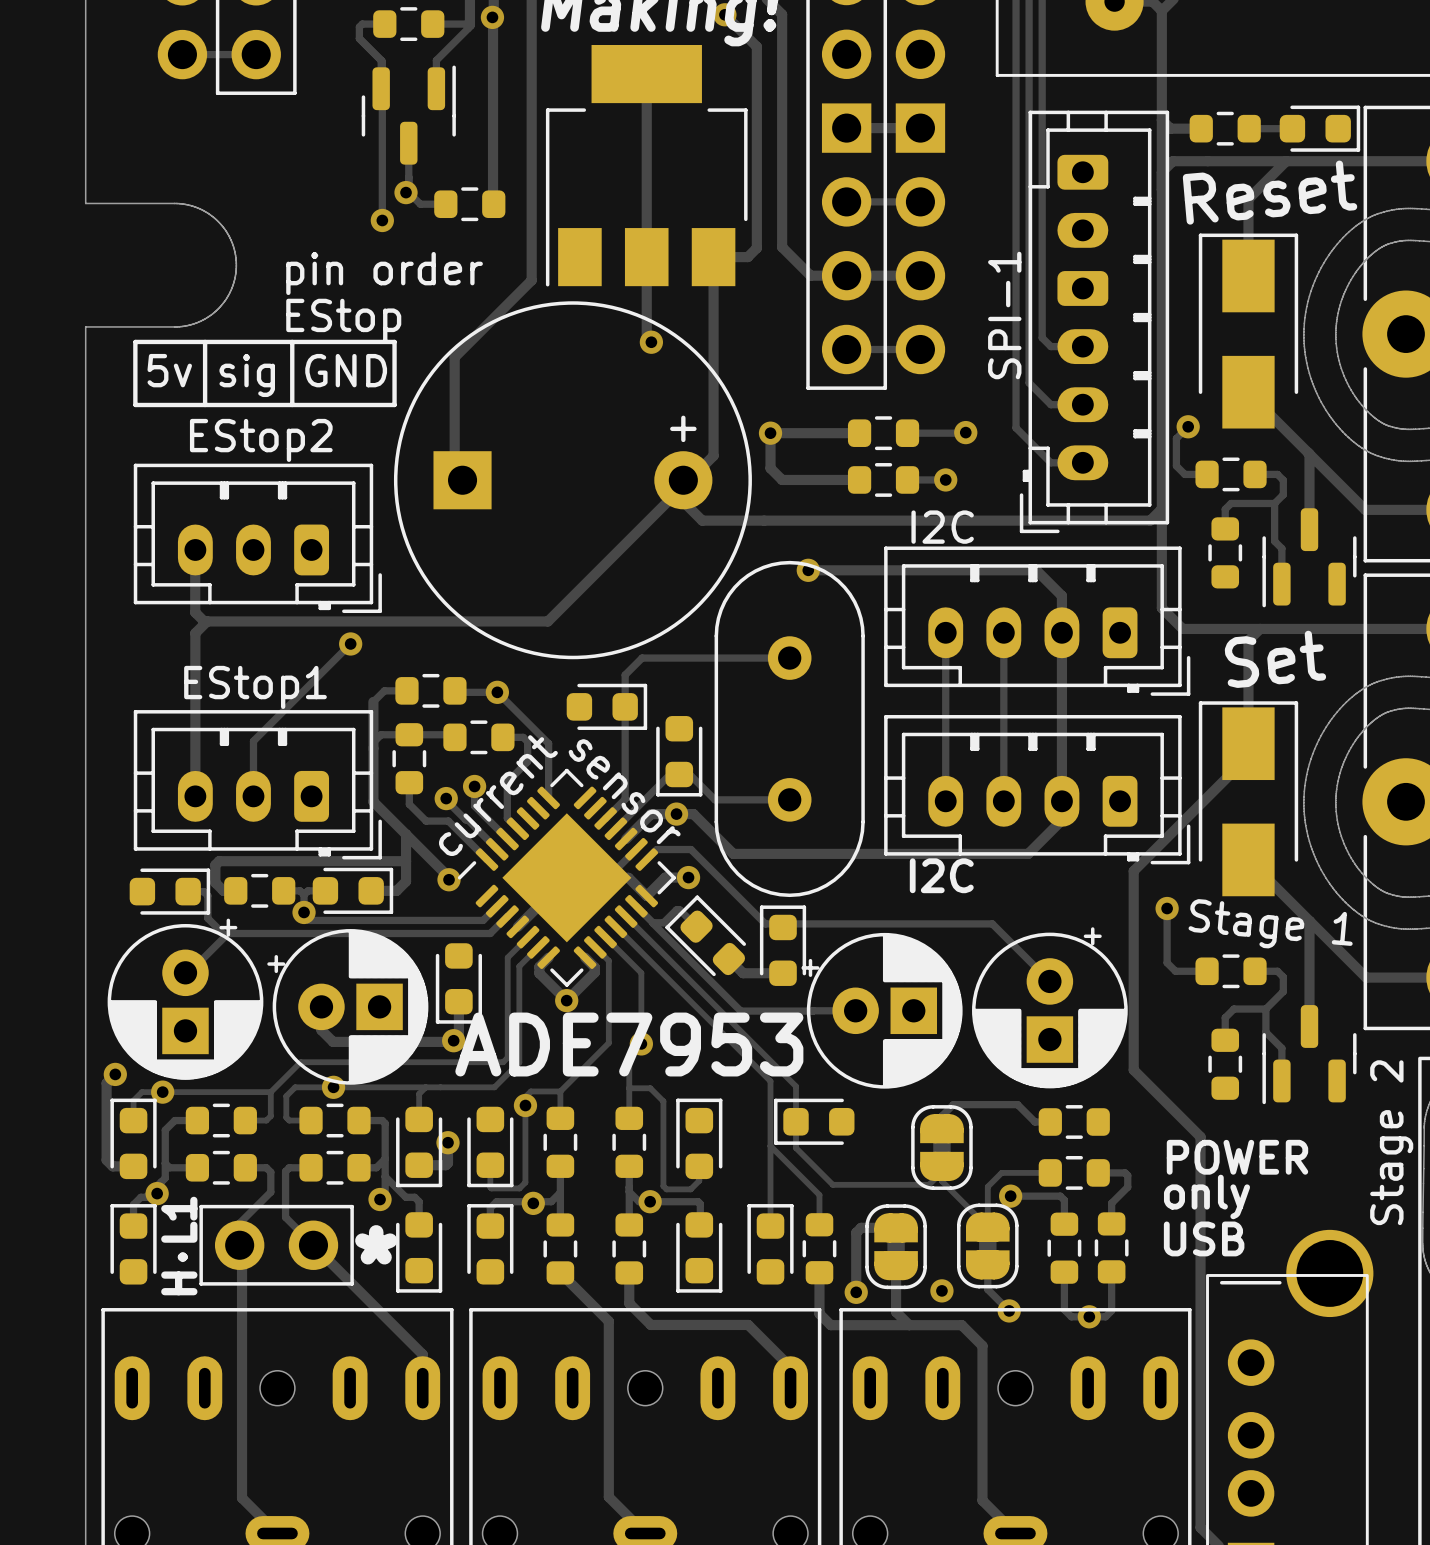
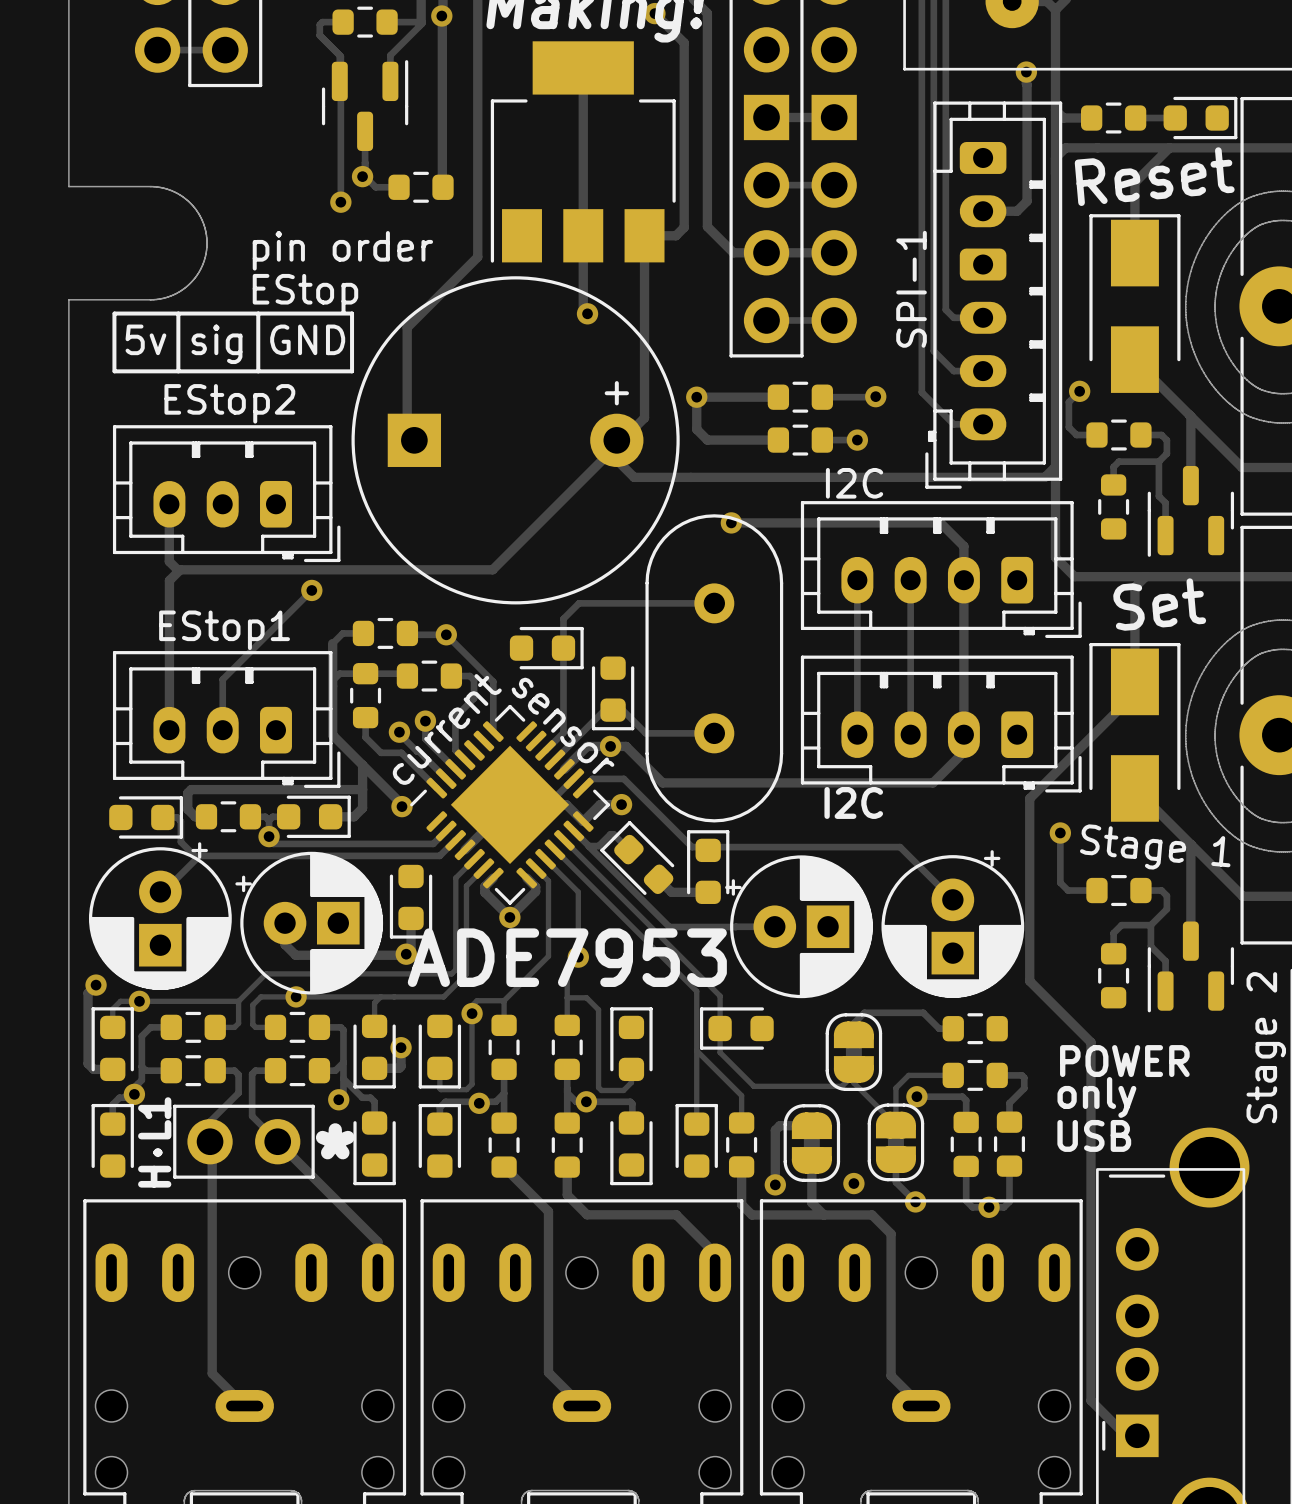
track: none -> (1026, 72) (1027, 201) (1017, 211) (983, 211)
via: none -> (1026, 72)

